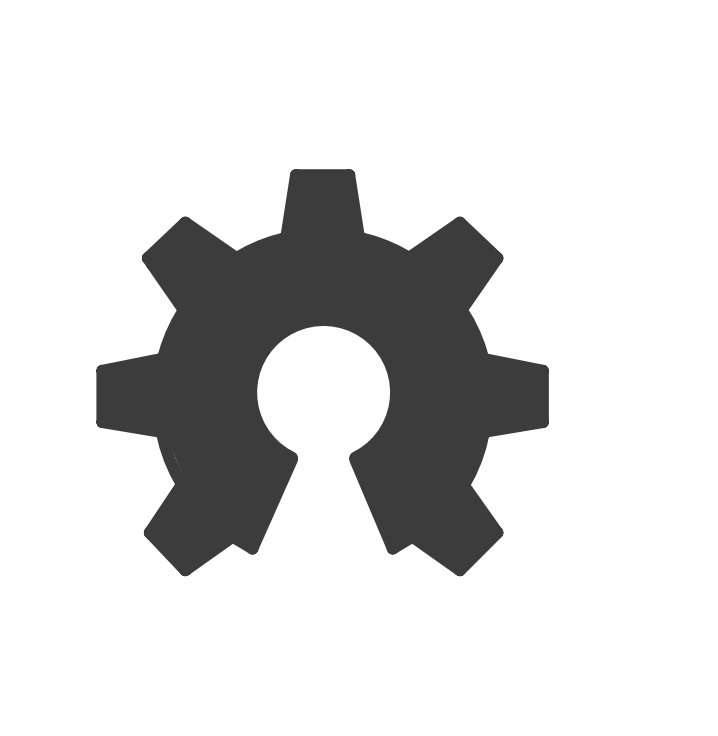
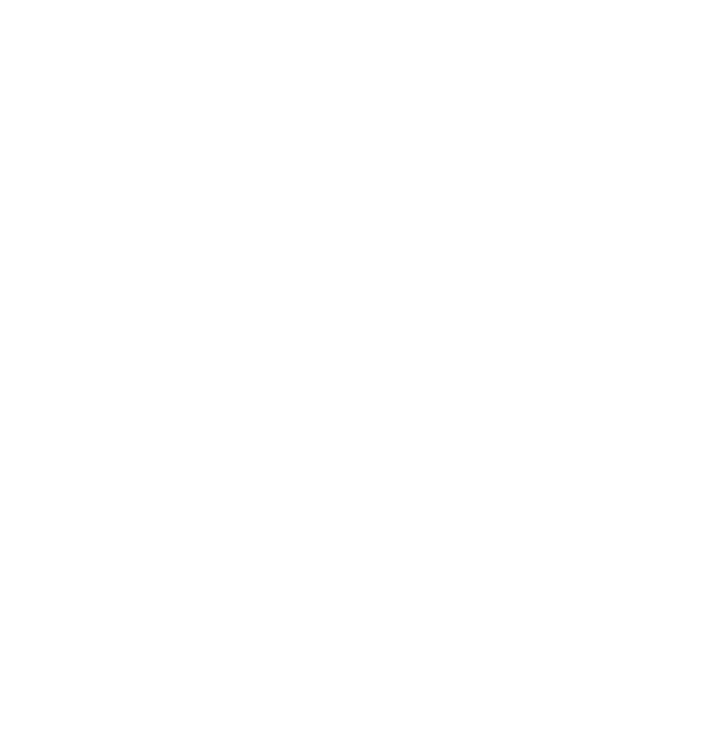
drawing: [96, 169, 549, 577] -> none

